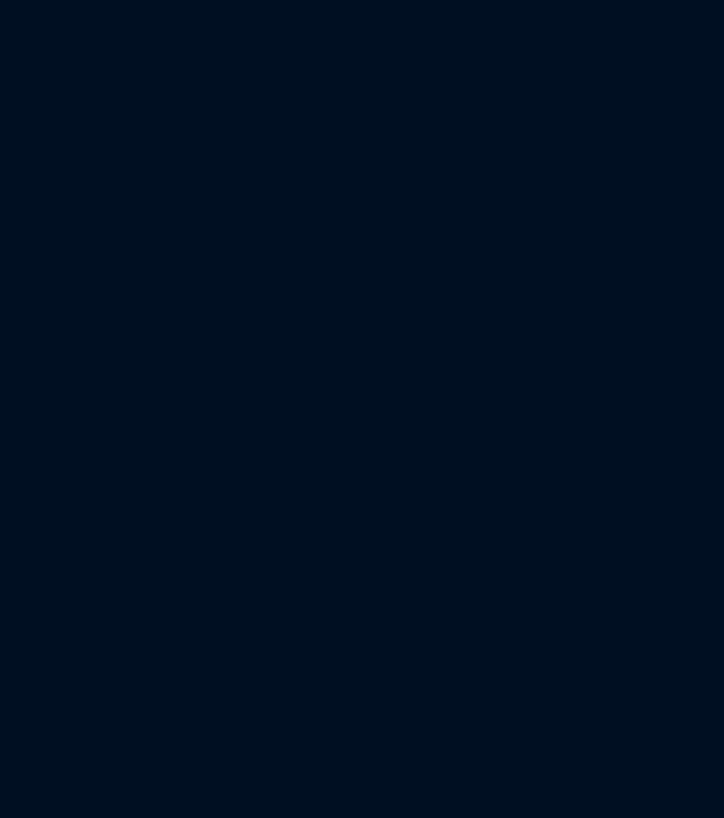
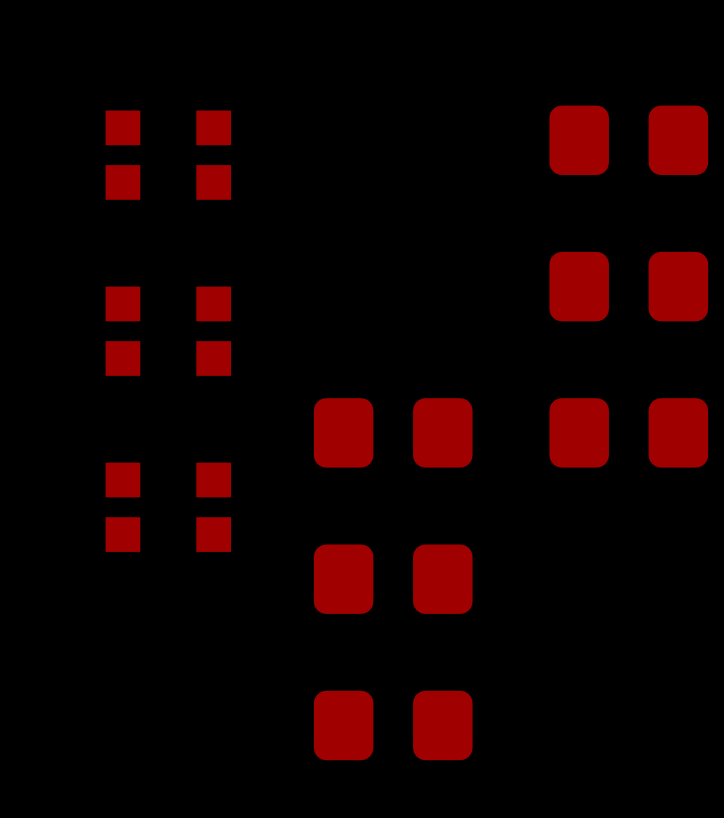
part: none -> (628, 140)
part: none -> (168, 155)
part: none -> (628, 286)
part: none -> (168, 331)
part: none -> (393, 432)
part: none -> (628, 432)
part: none -> (168, 507)
part: none -> (393, 579)
part: none -> (393, 725)

